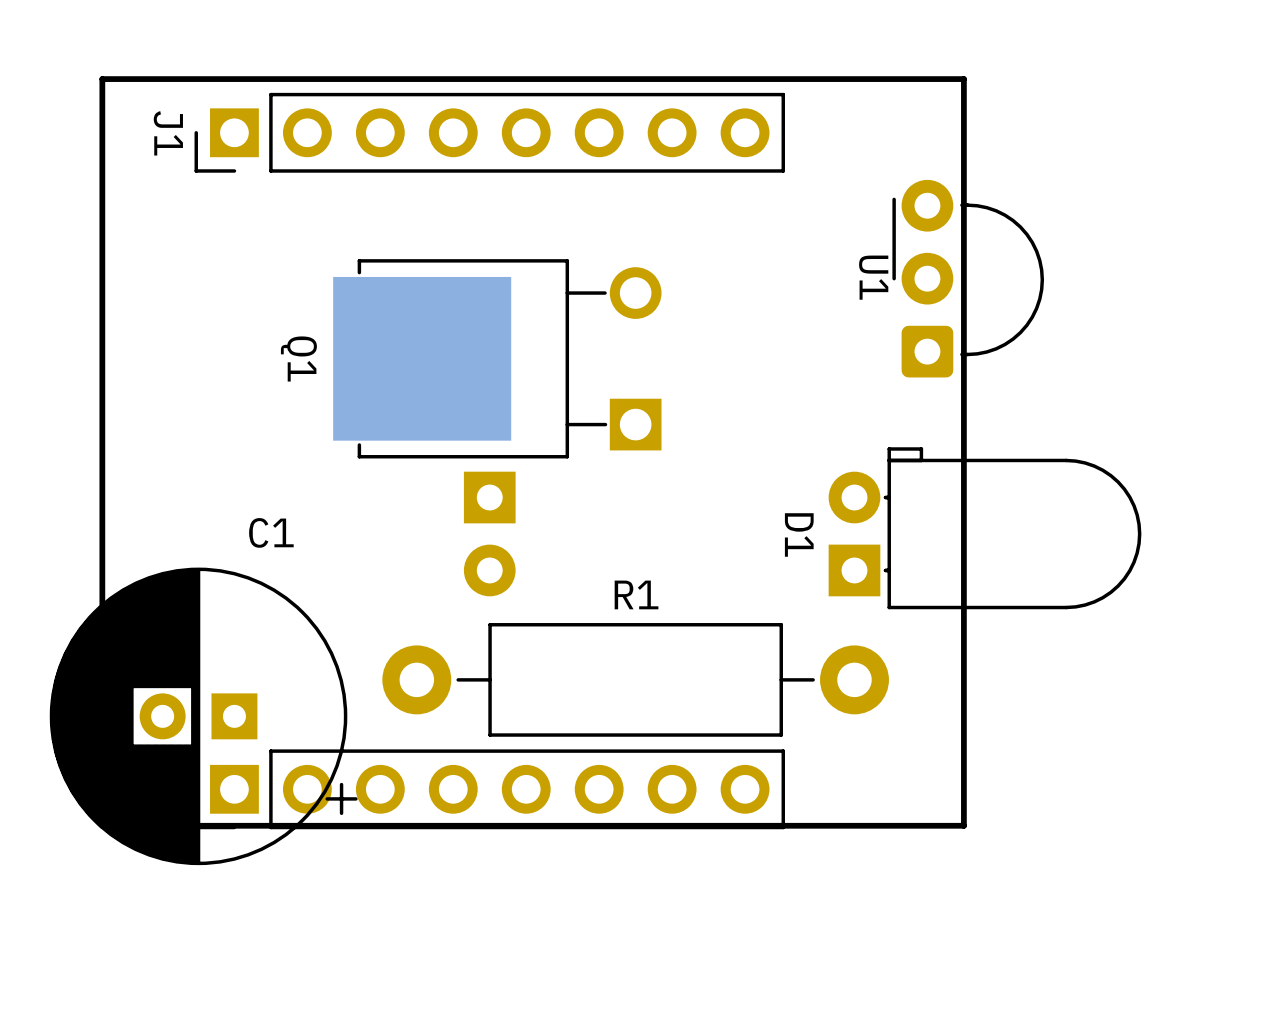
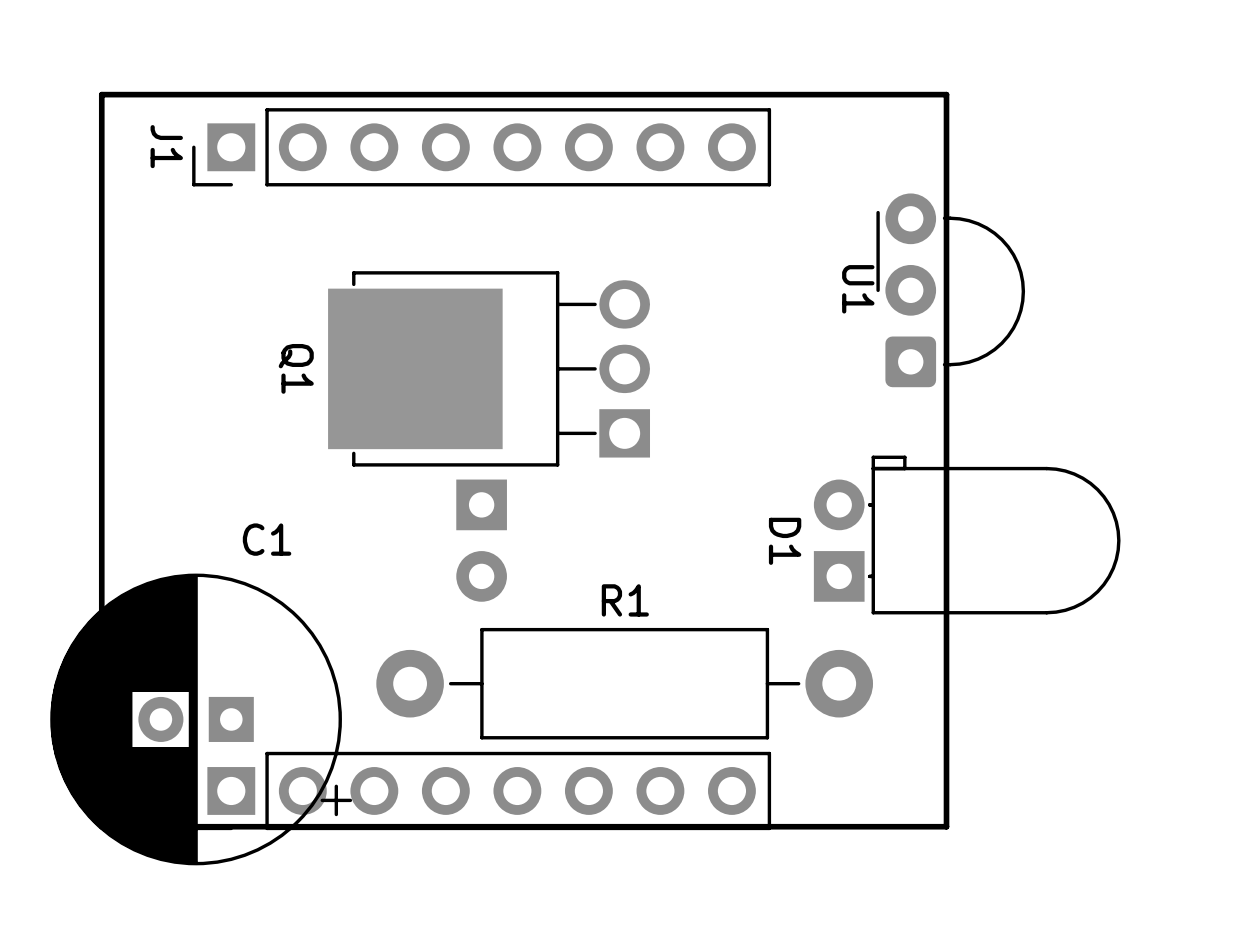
Q1 footprint: [333, 259, 662, 459] -> [328, 271, 651, 467]

